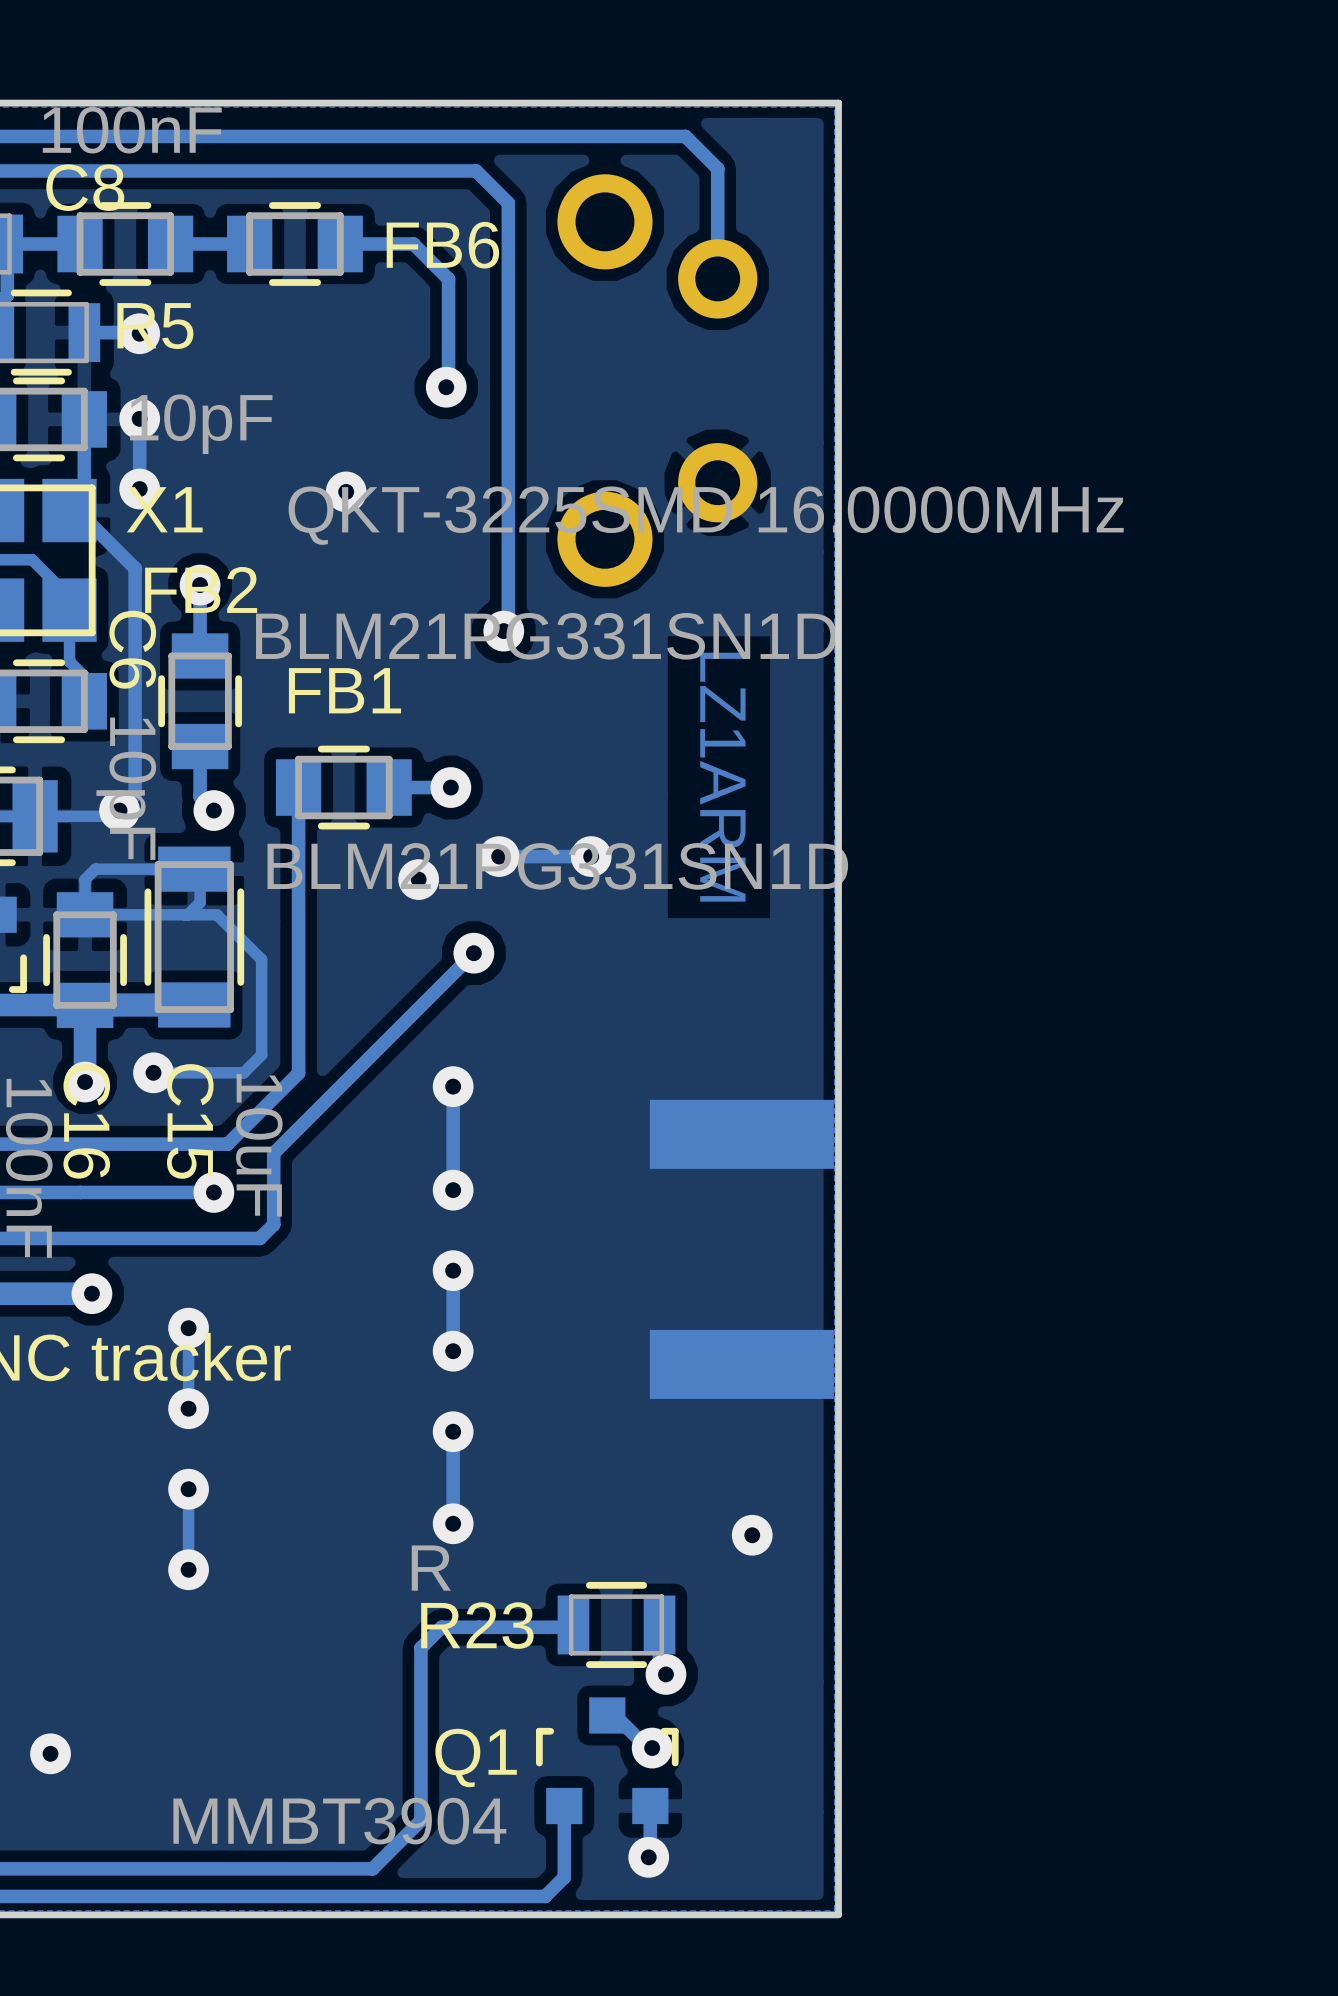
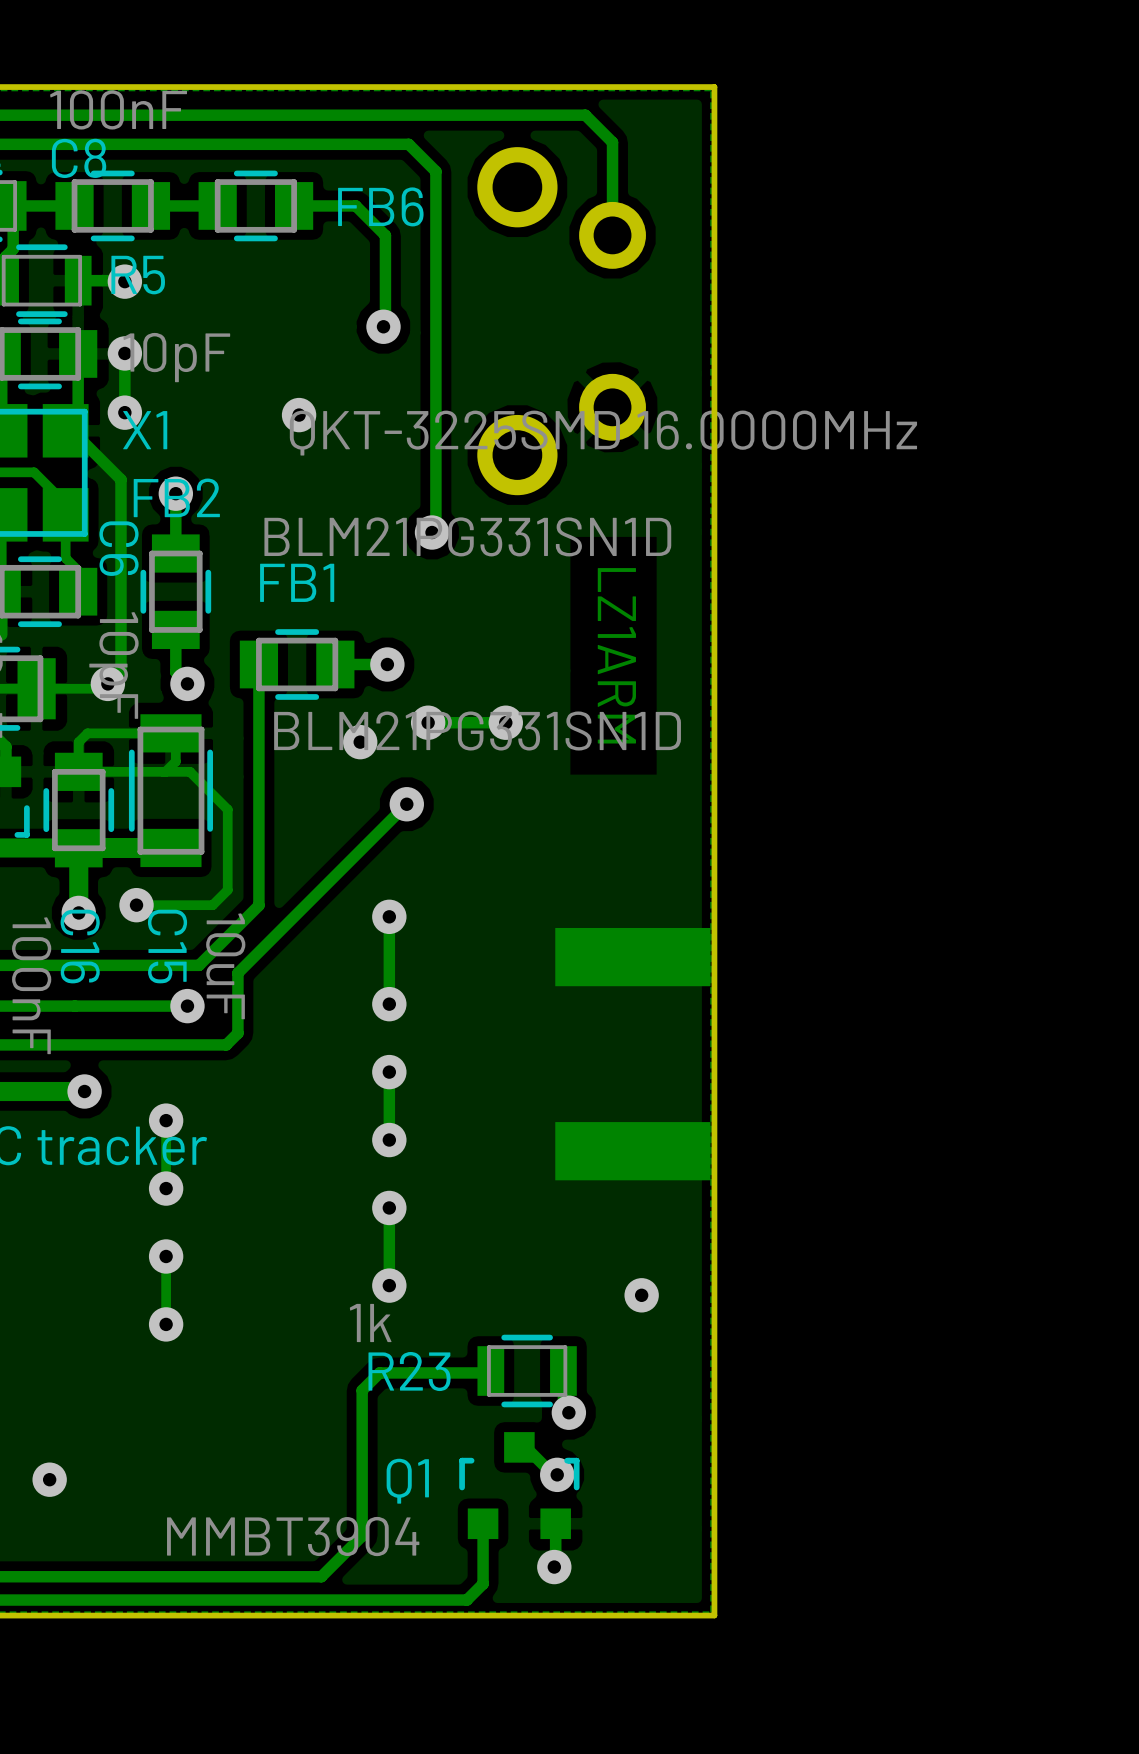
R23 value: R (431, 1568) -> 1k (370, 1322)

